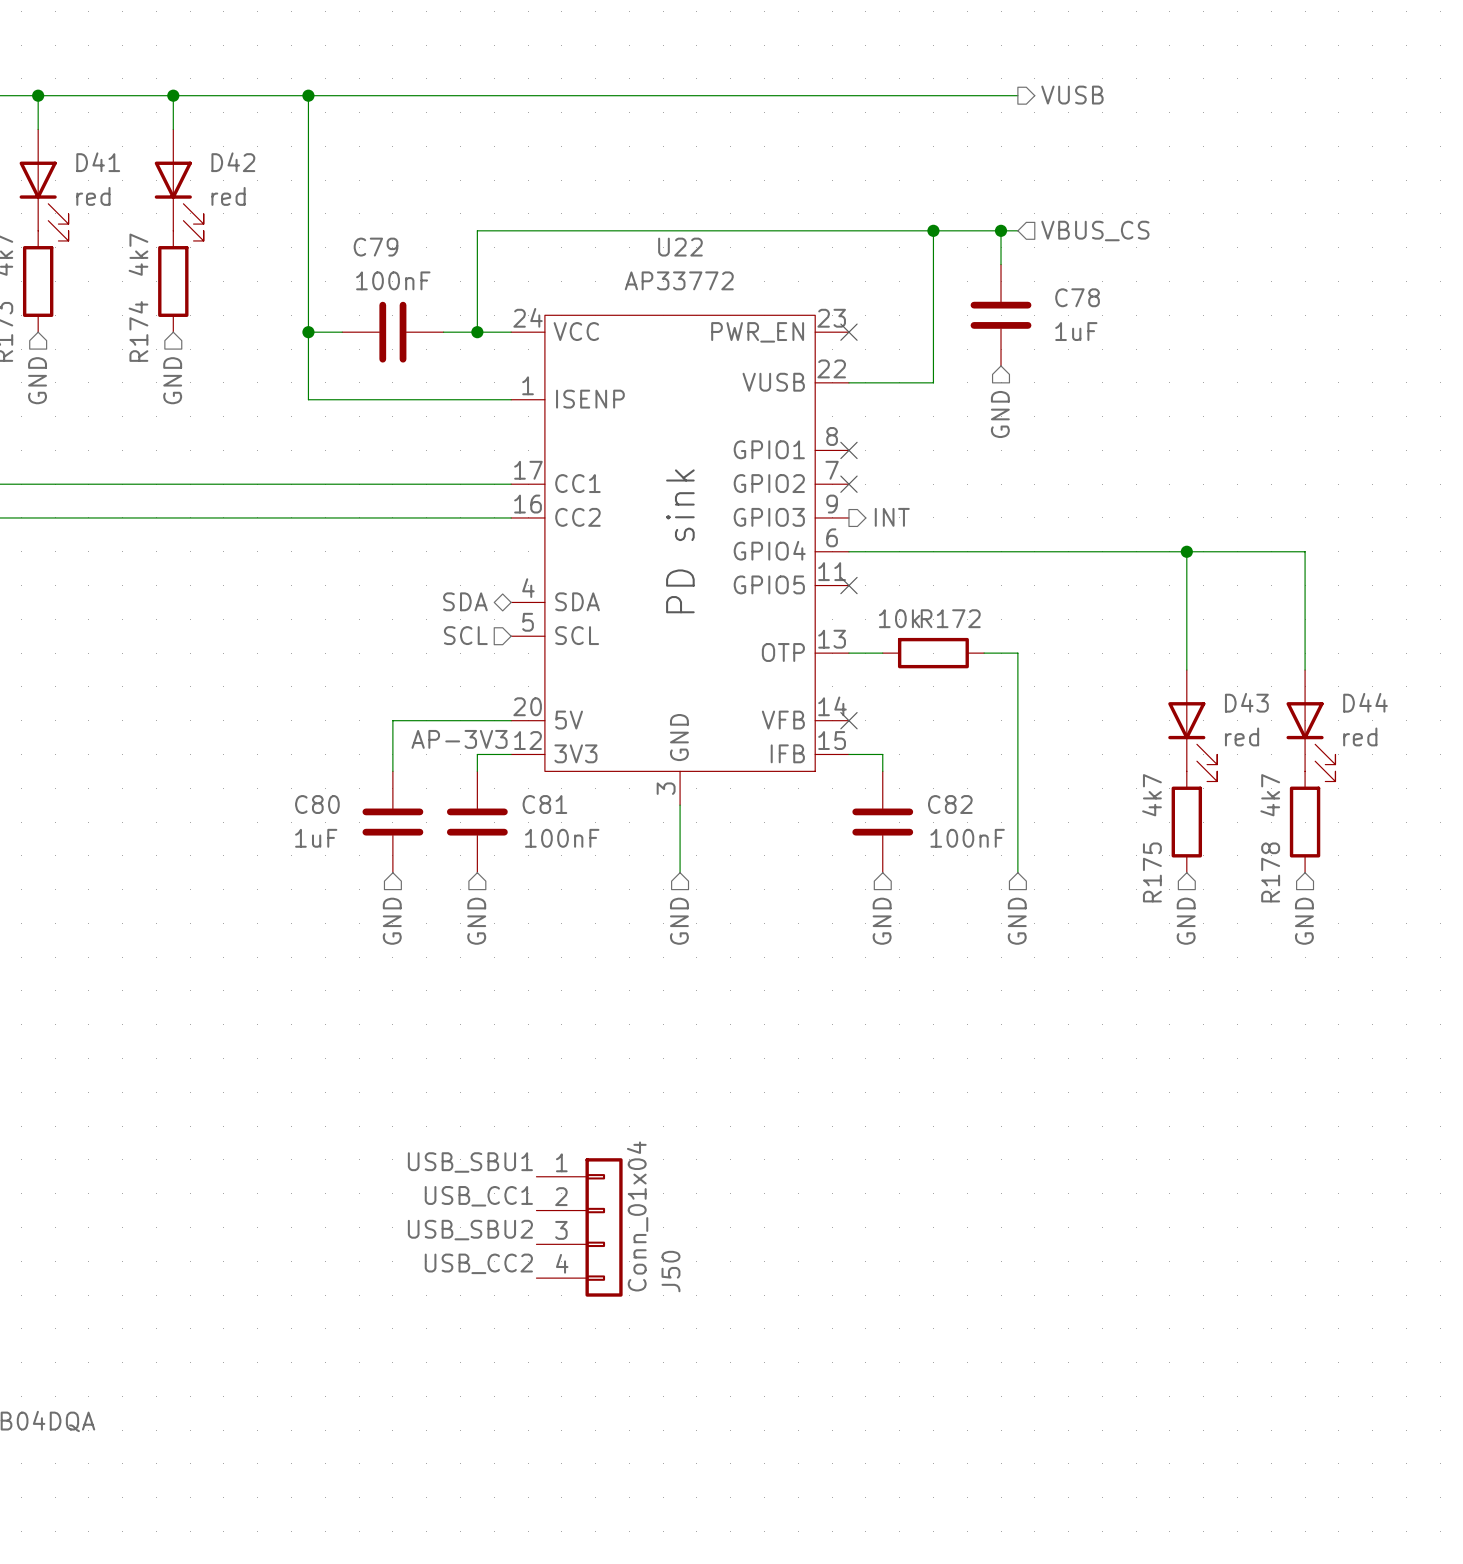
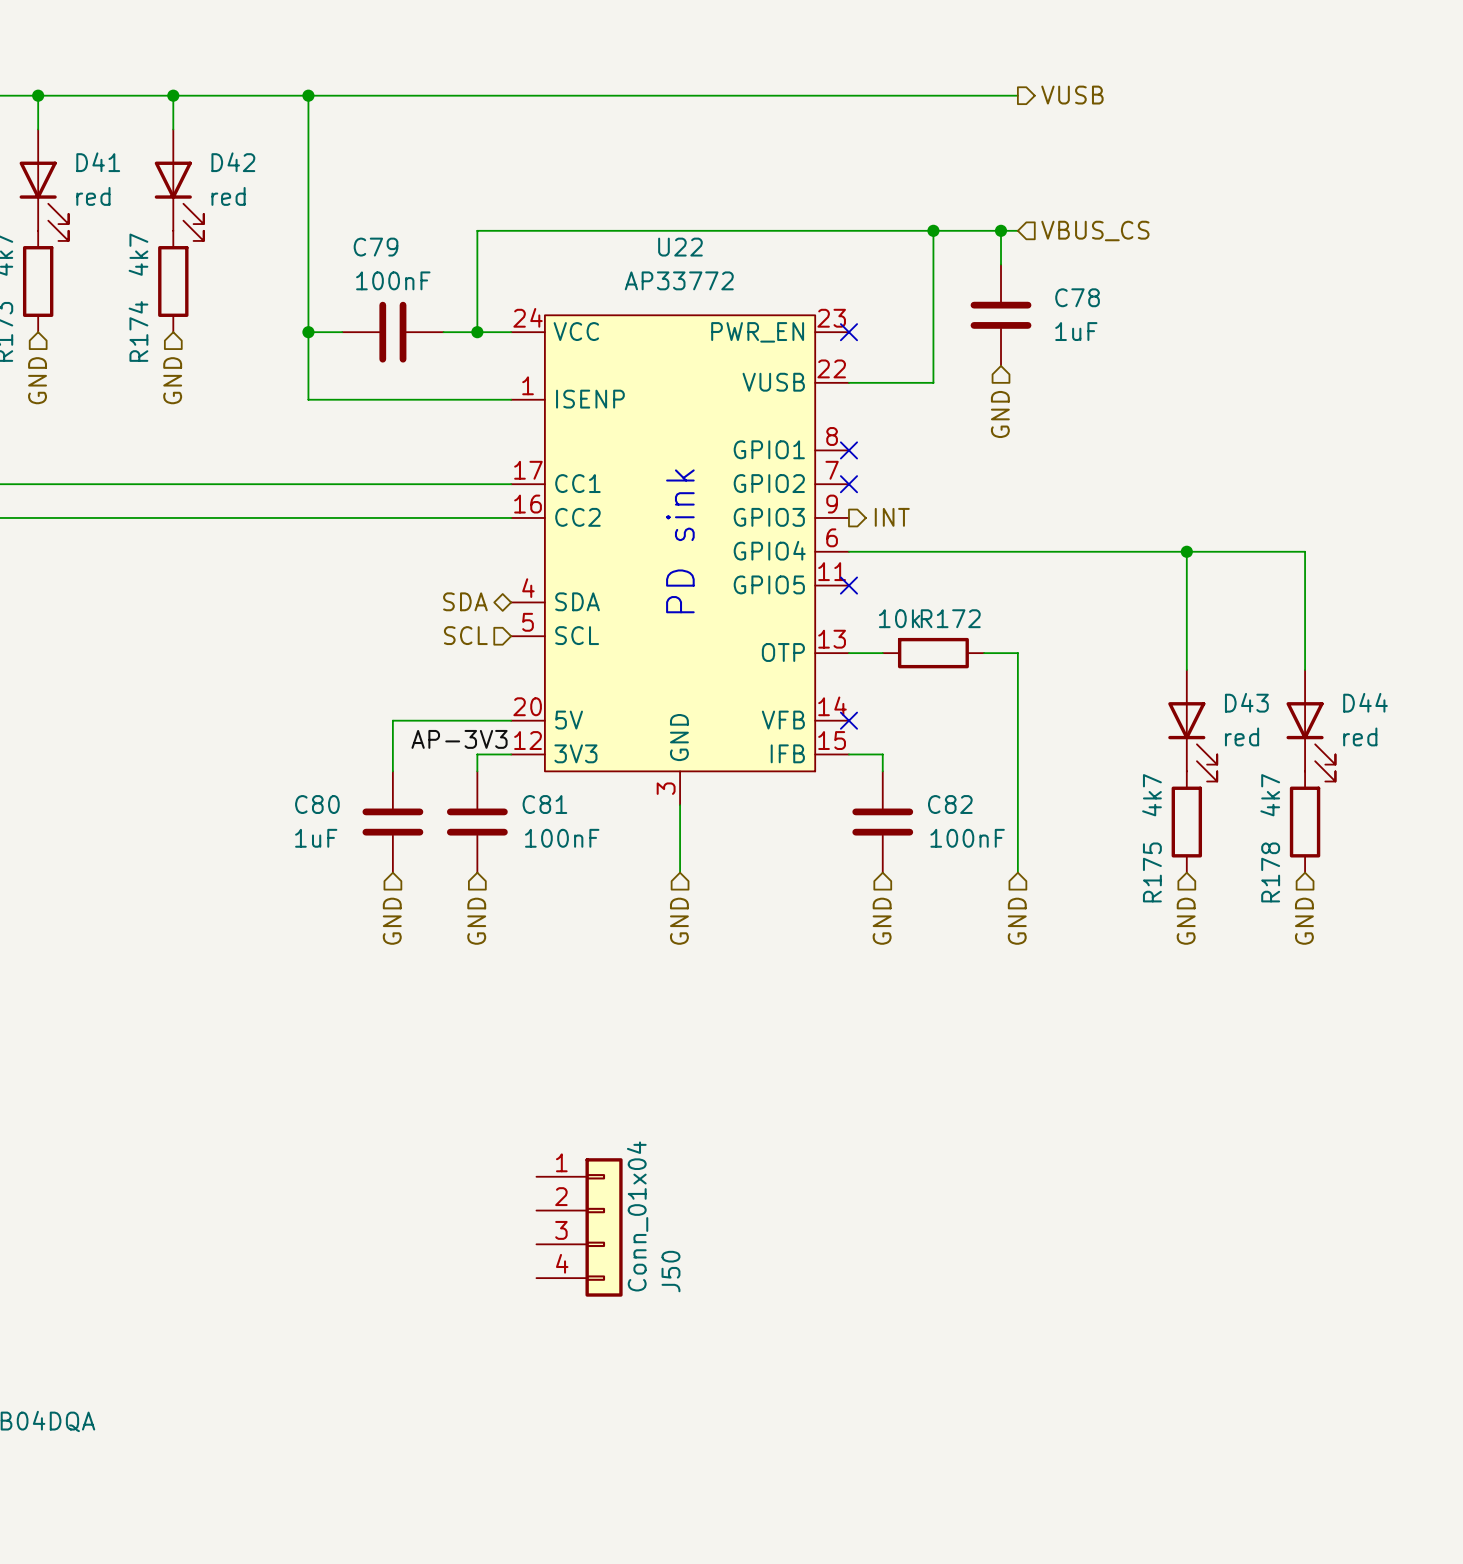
label: USB_SBU1 (470, 1162) -> none
label: USB_CC1 (478, 1196) -> none
label: USB_SBU2 (470, 1230) -> none
label: USB_CC2 (478, 1263) -> none

